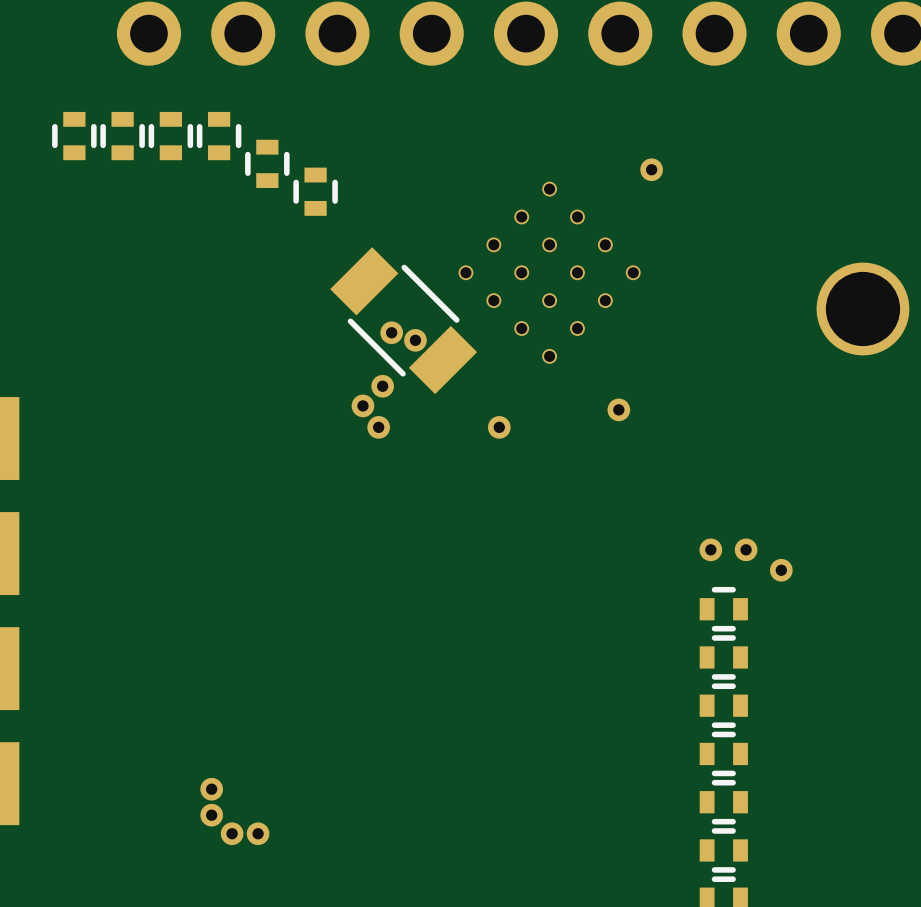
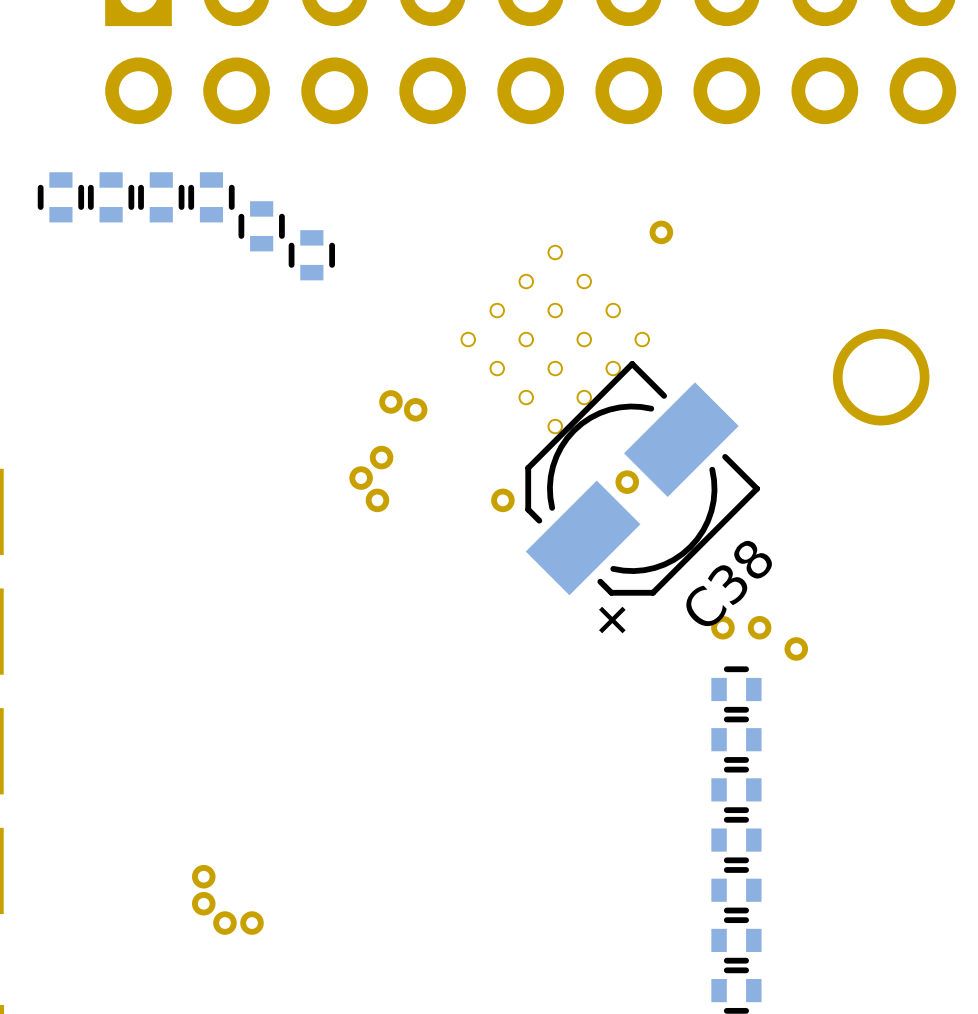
part: (403, 320) -> none
C38: none -> (642, 478)

